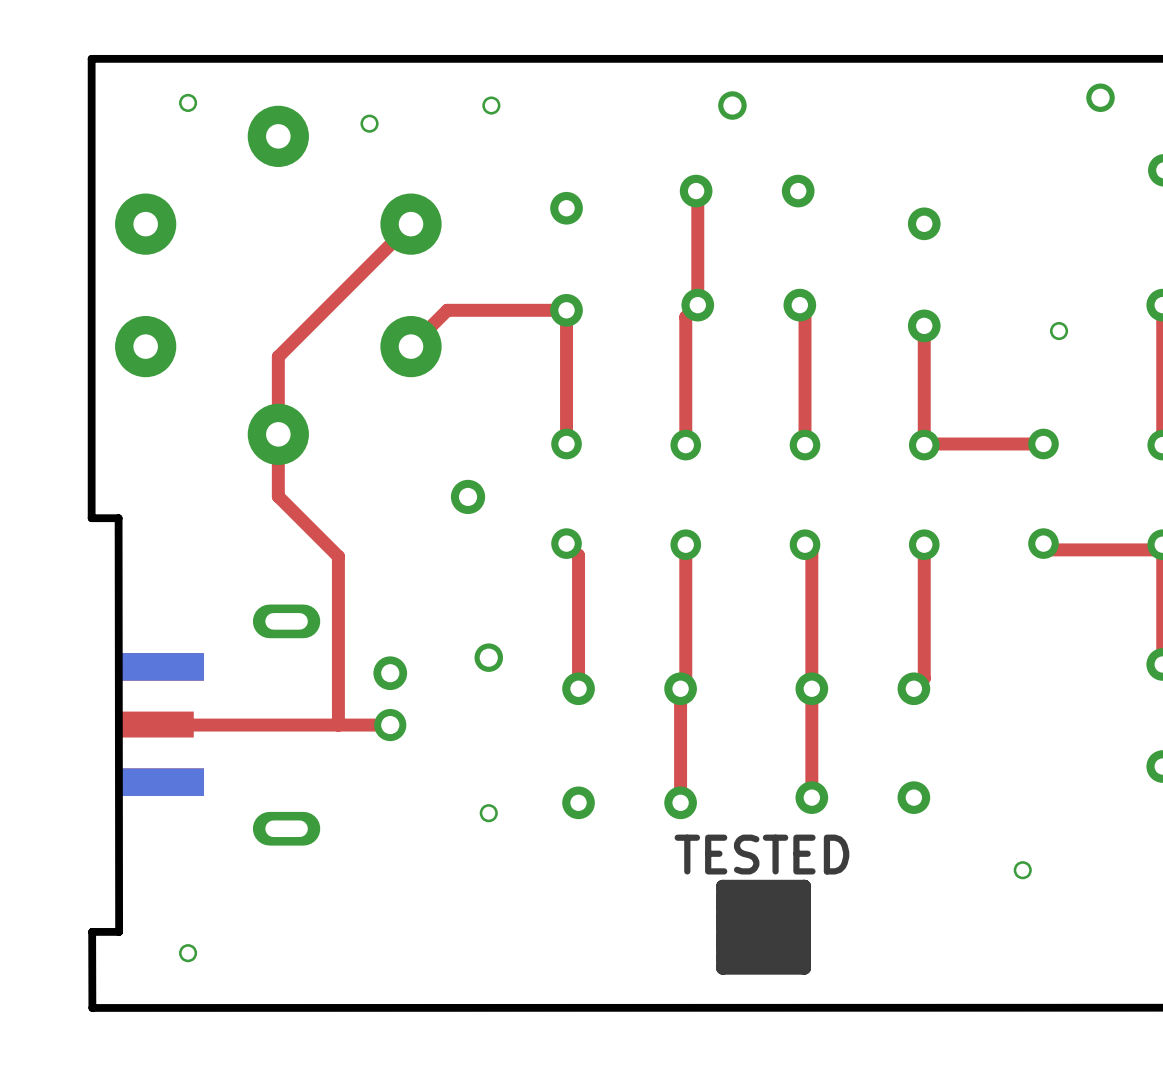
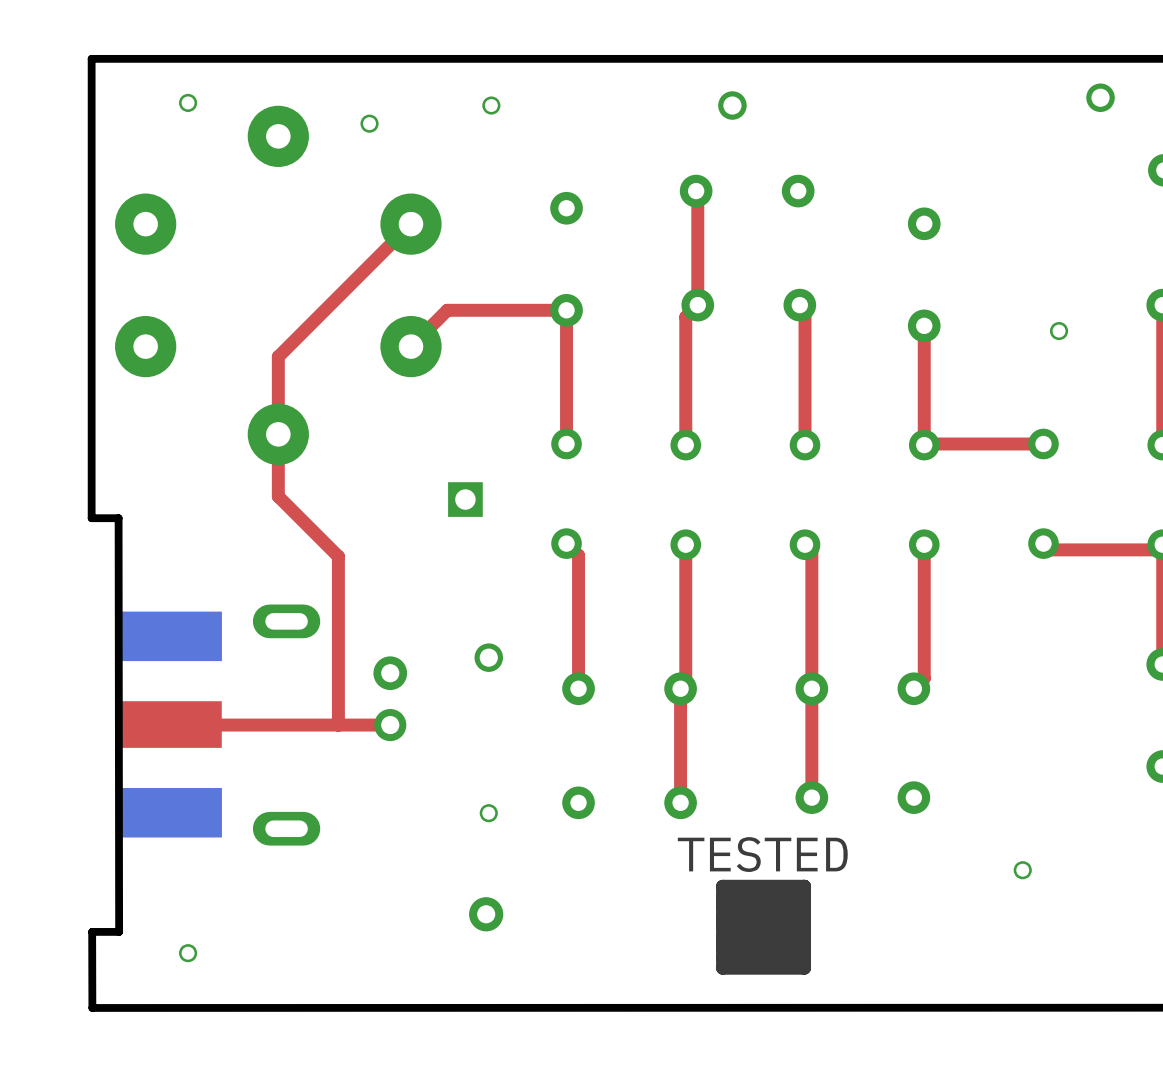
via: (468, 496) -> none
part: none -> (465, 499)
part footprint: [118, 653, 204, 796] -> [118, 611, 222, 838]
via: none -> (486, 914)

